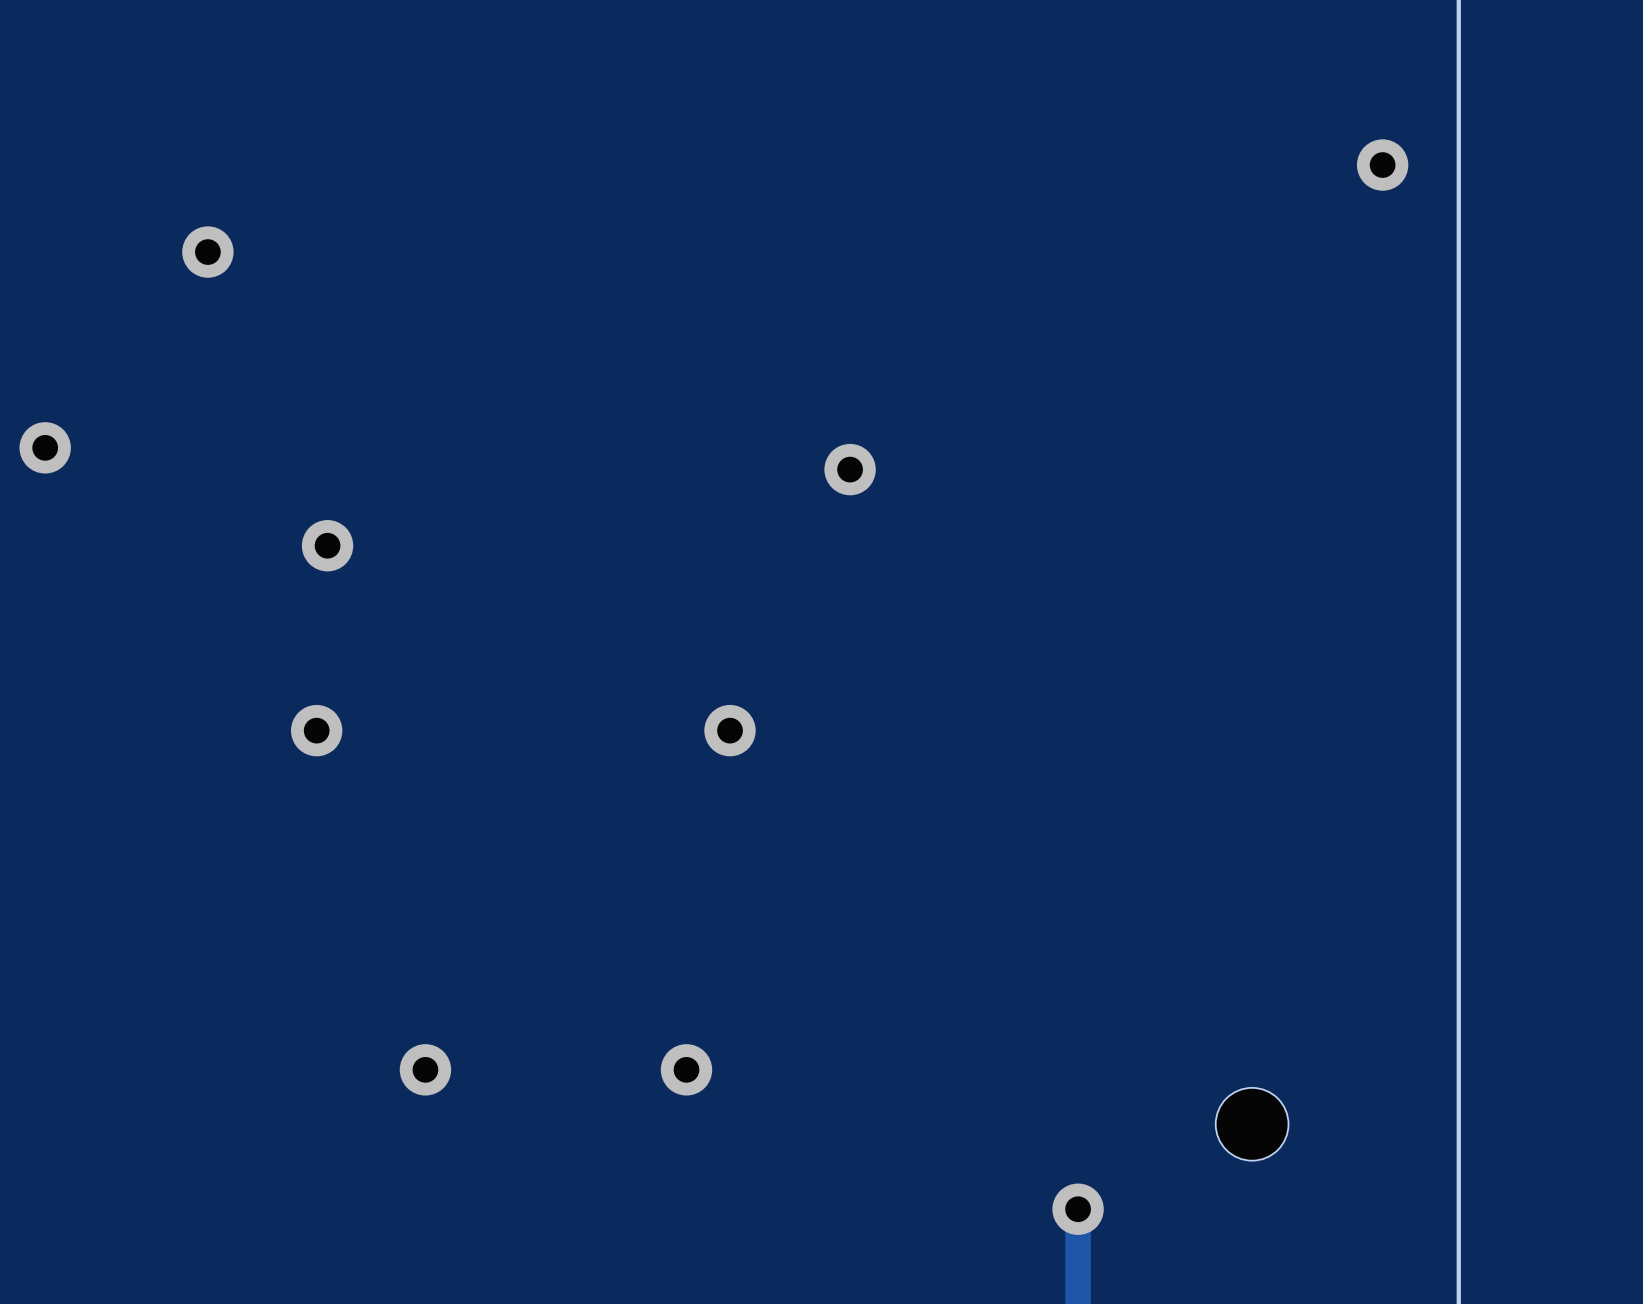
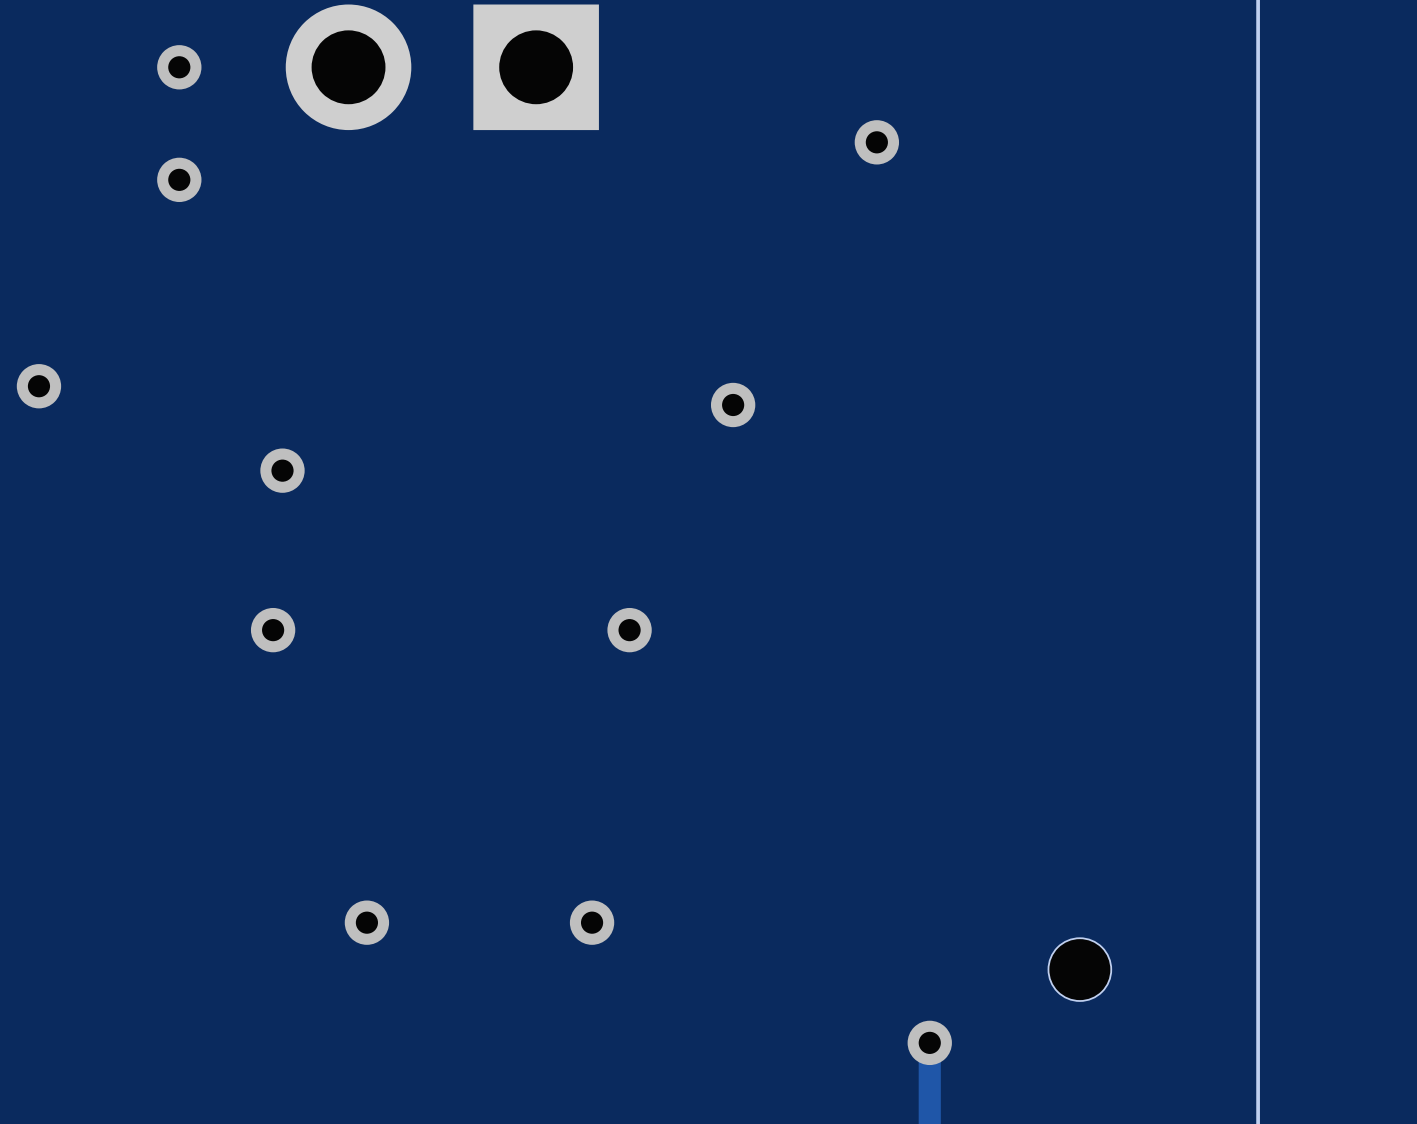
via: none -> (179, 67)
part: none -> (442, 67)
via: none -> (876, 142)
via: (1382, 165) -> none
via position: (207, 252) -> (179, 179)

